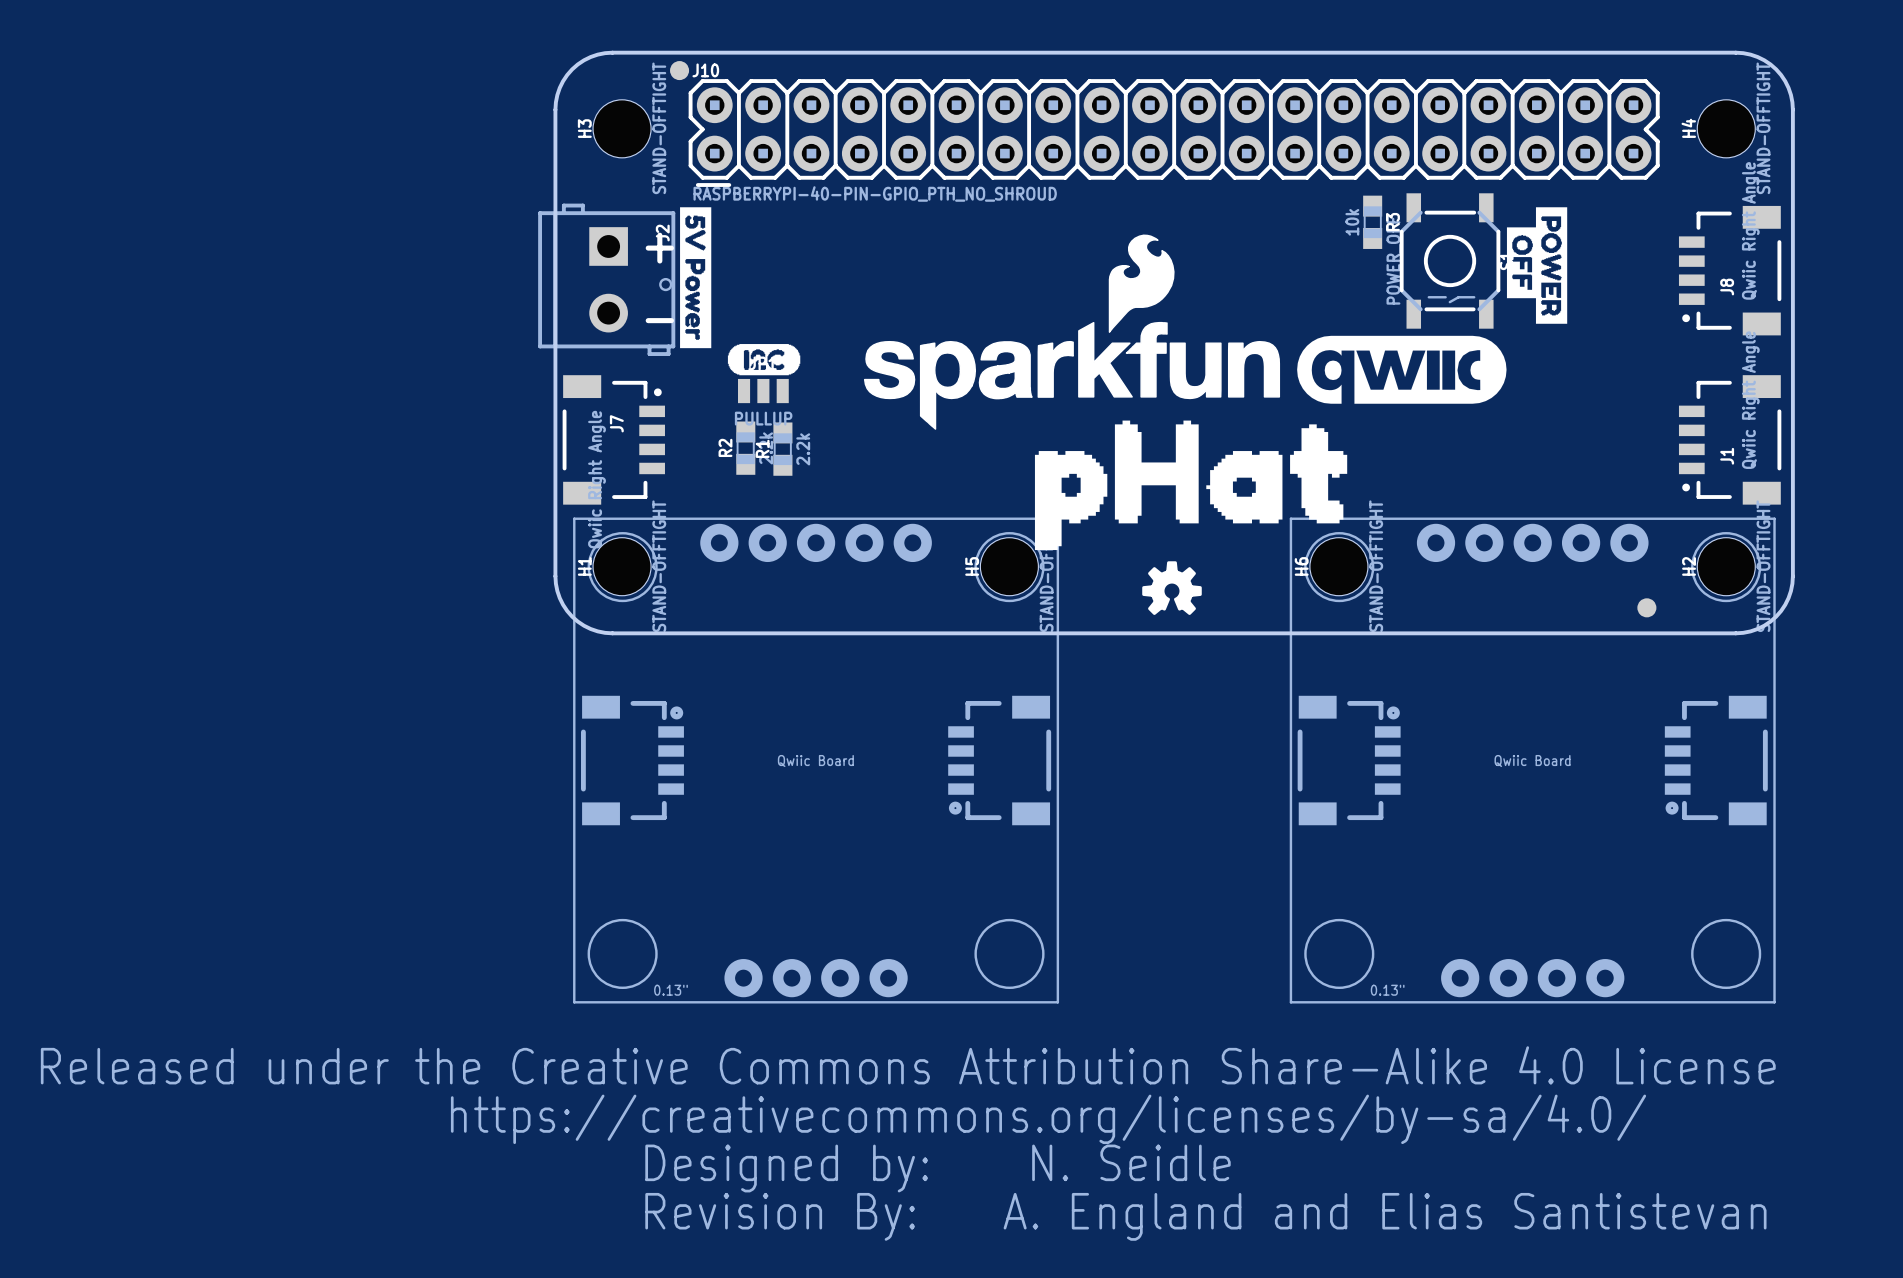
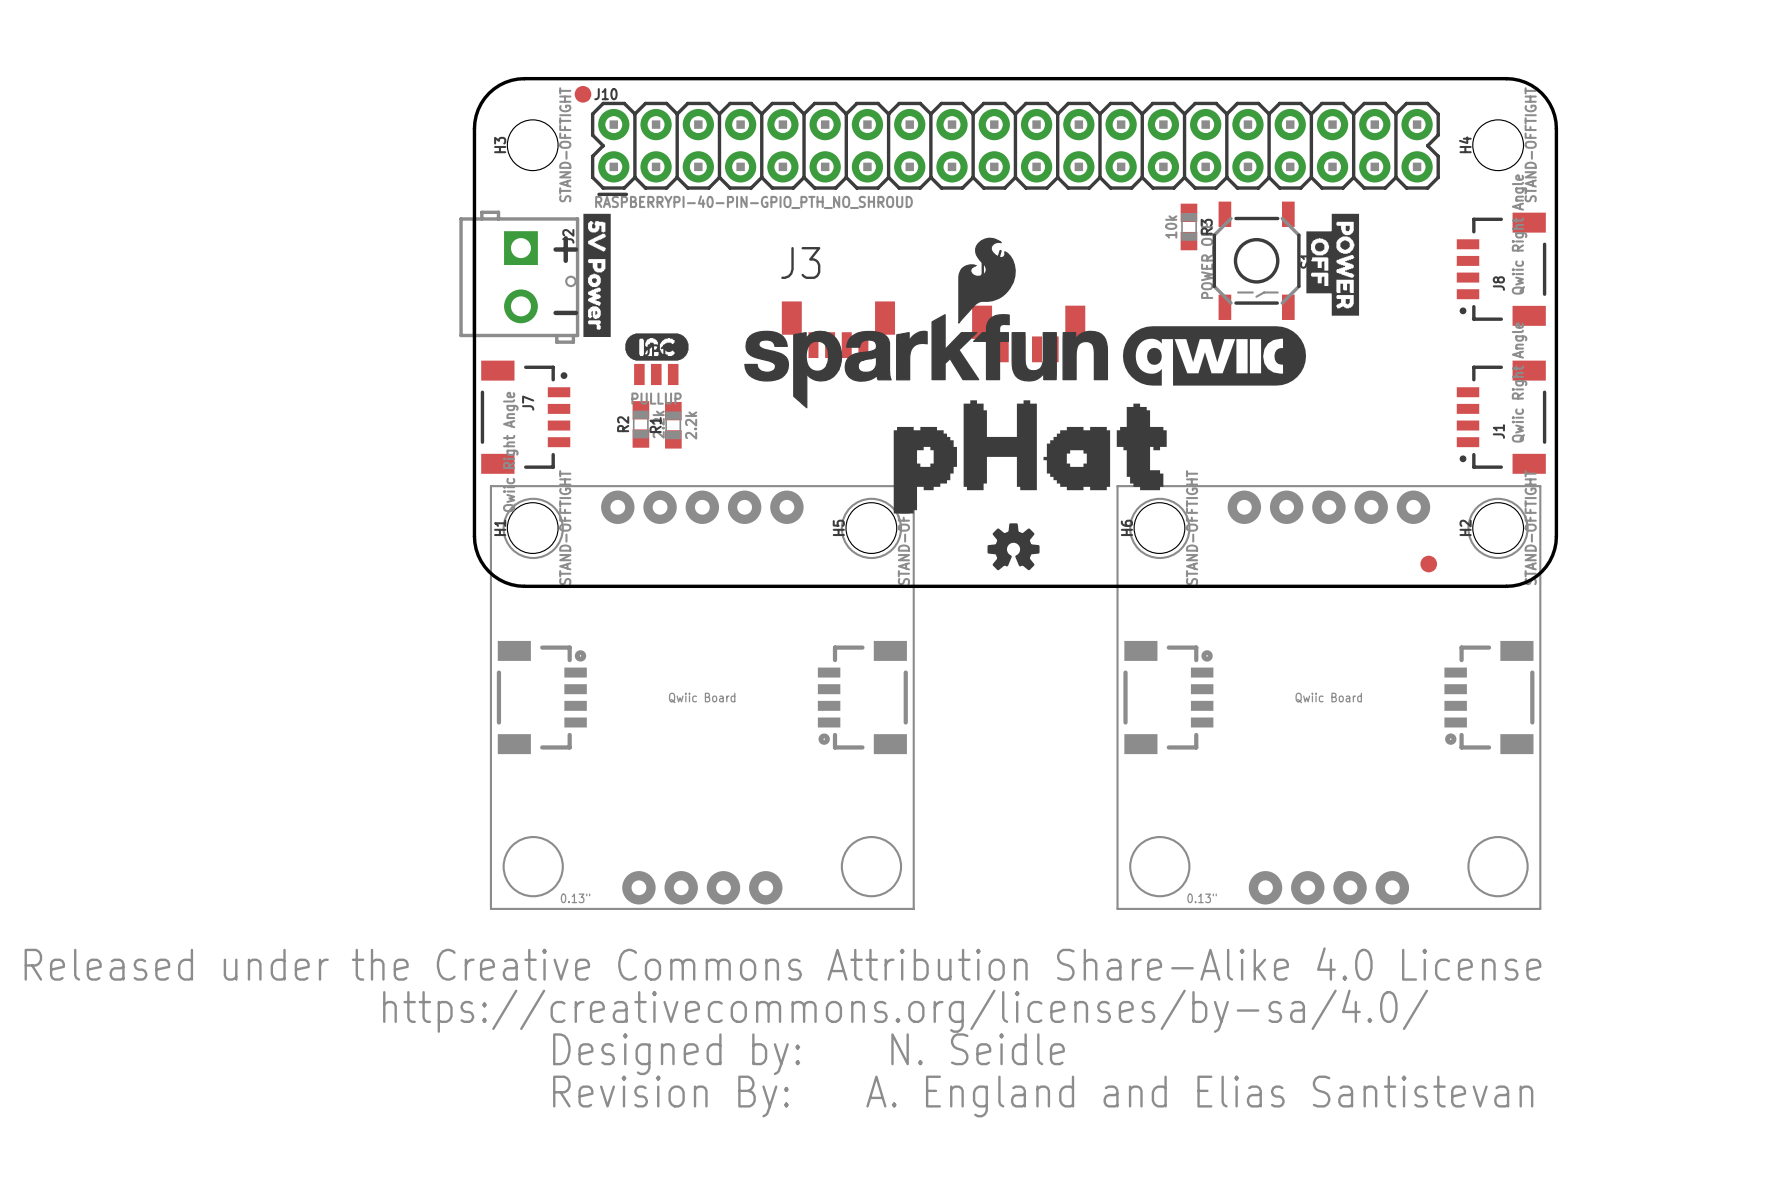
J3: none -> (838, 329)
part: none -> (1028, 333)

